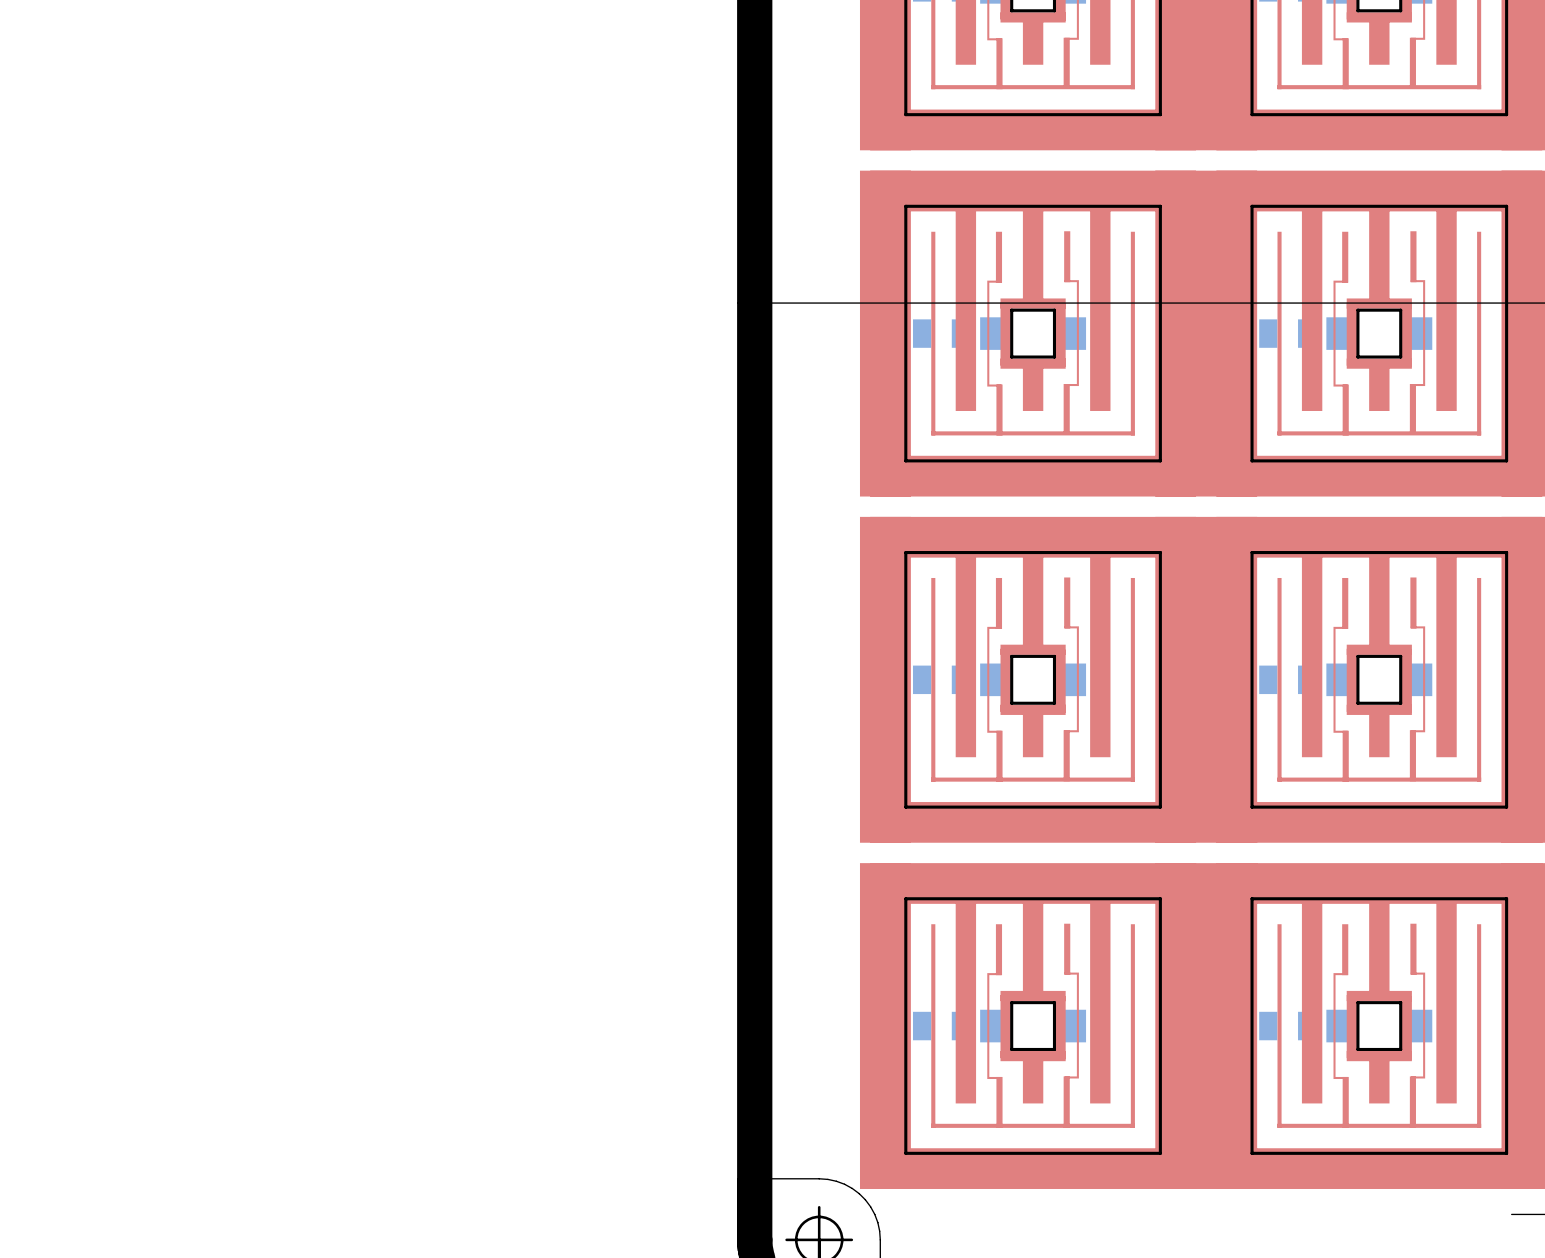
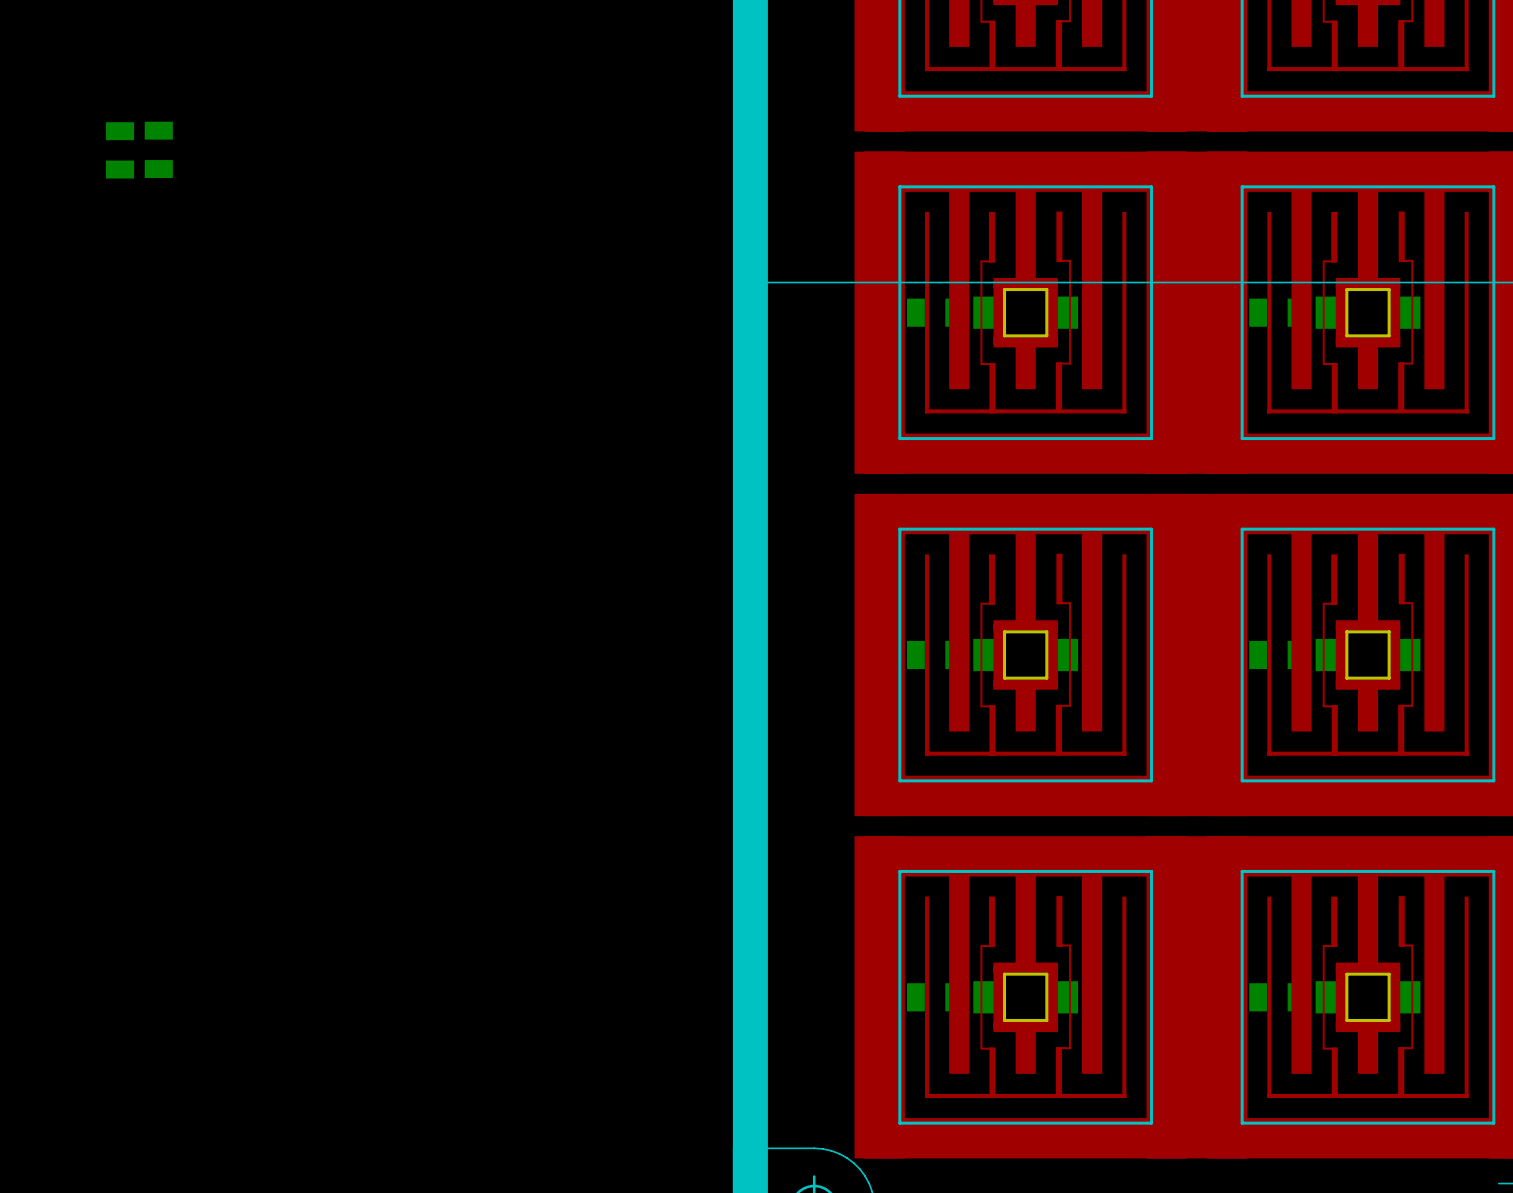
part: none -> (158, 149)
part: none -> (120, 150)

